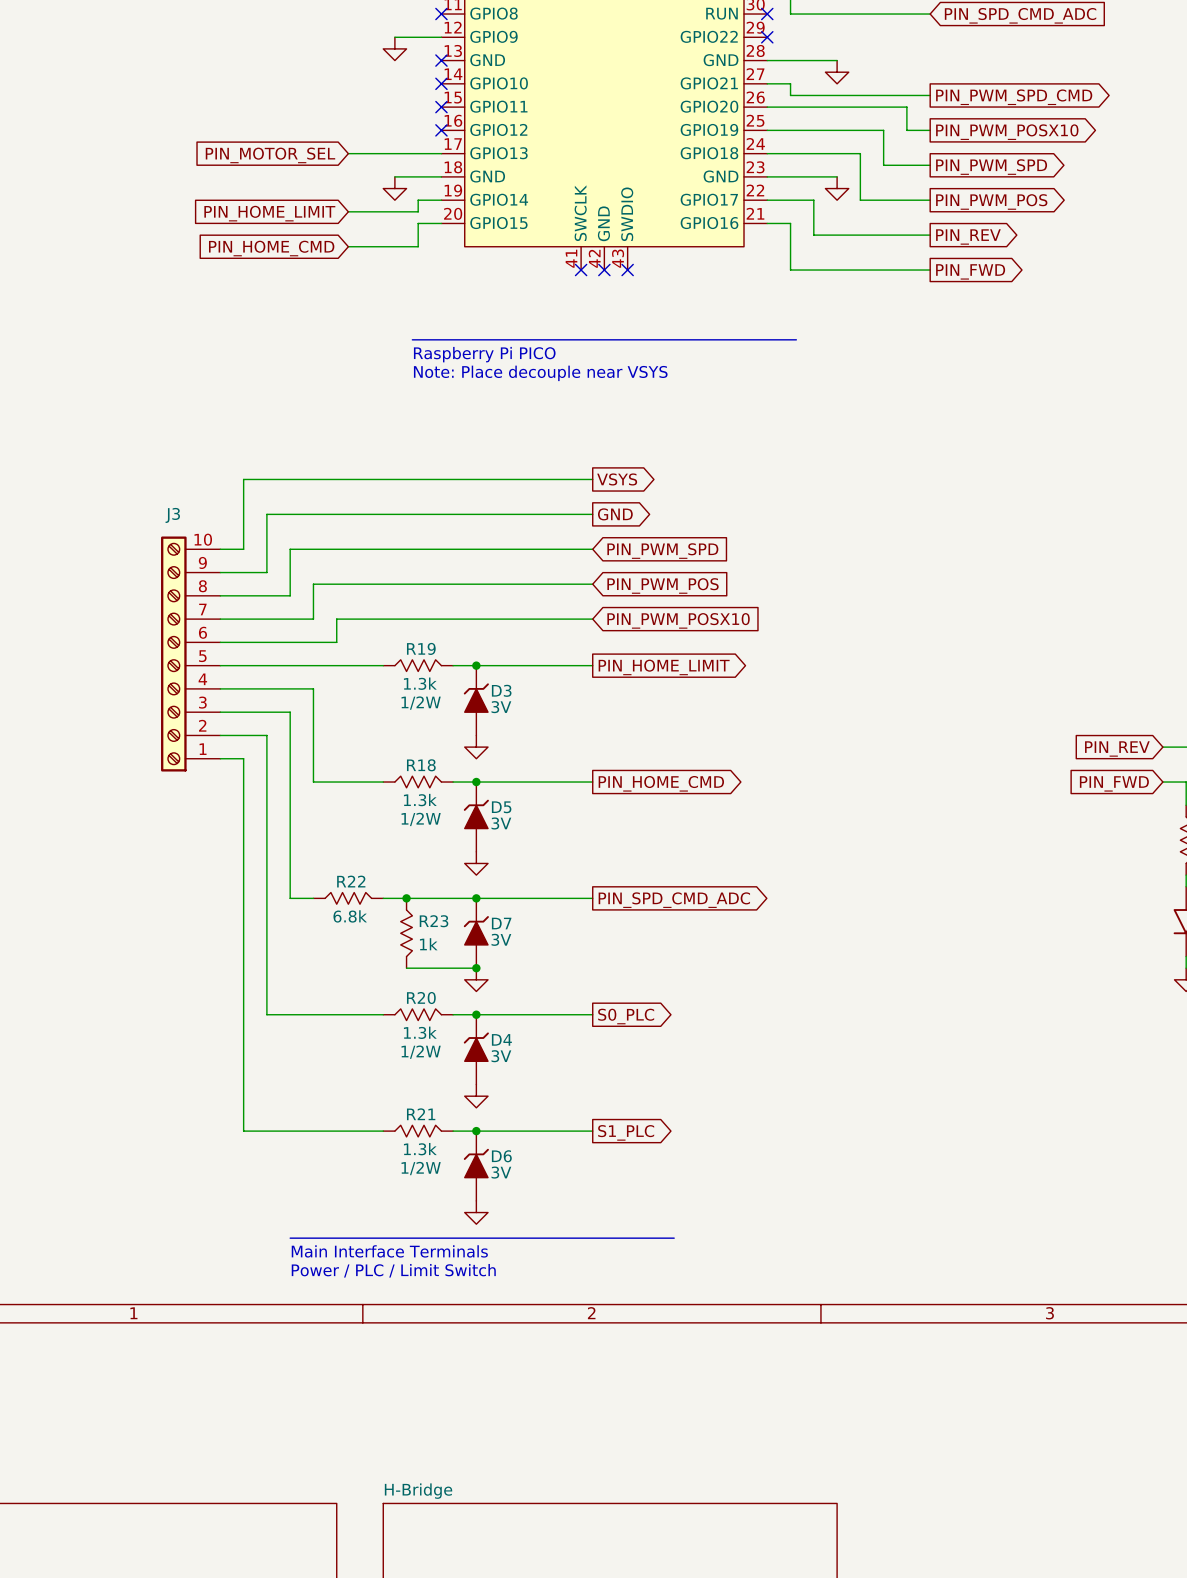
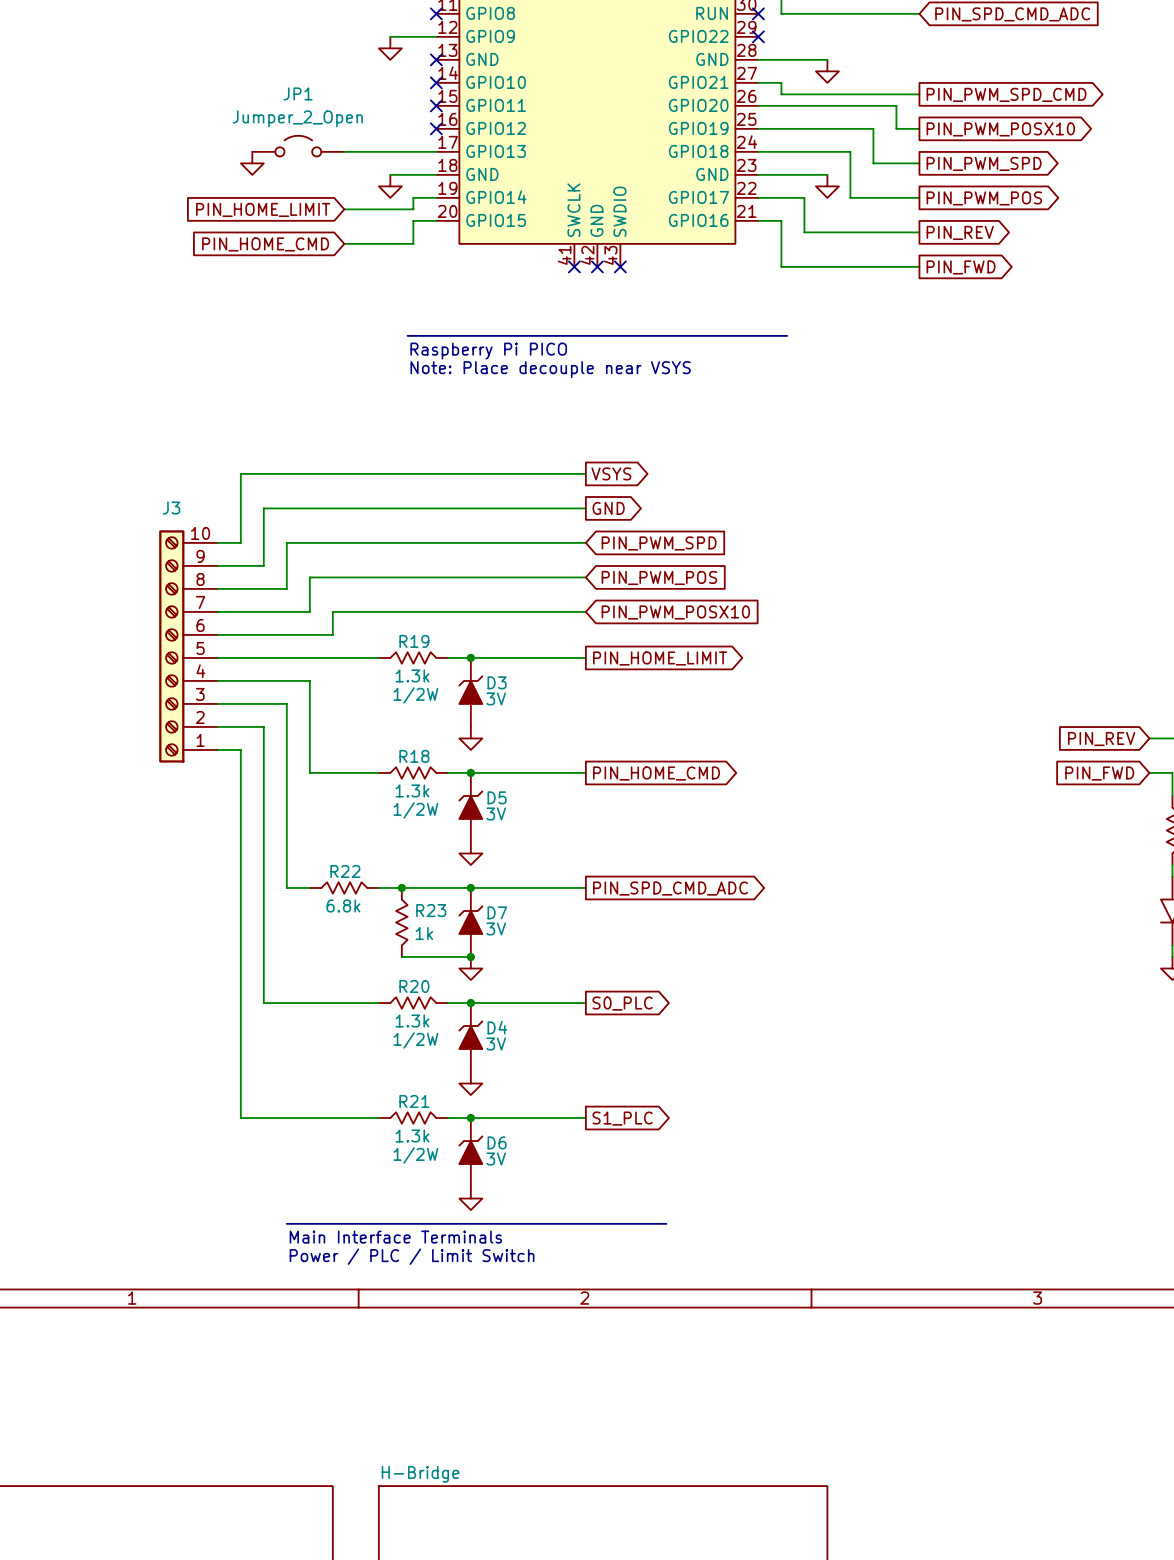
JP1: none -> Jumper_2_Open (298, 146)
global label: PIN_MOTOR_SEL (270, 155) -> none
power symbol: none -> (252, 163)

